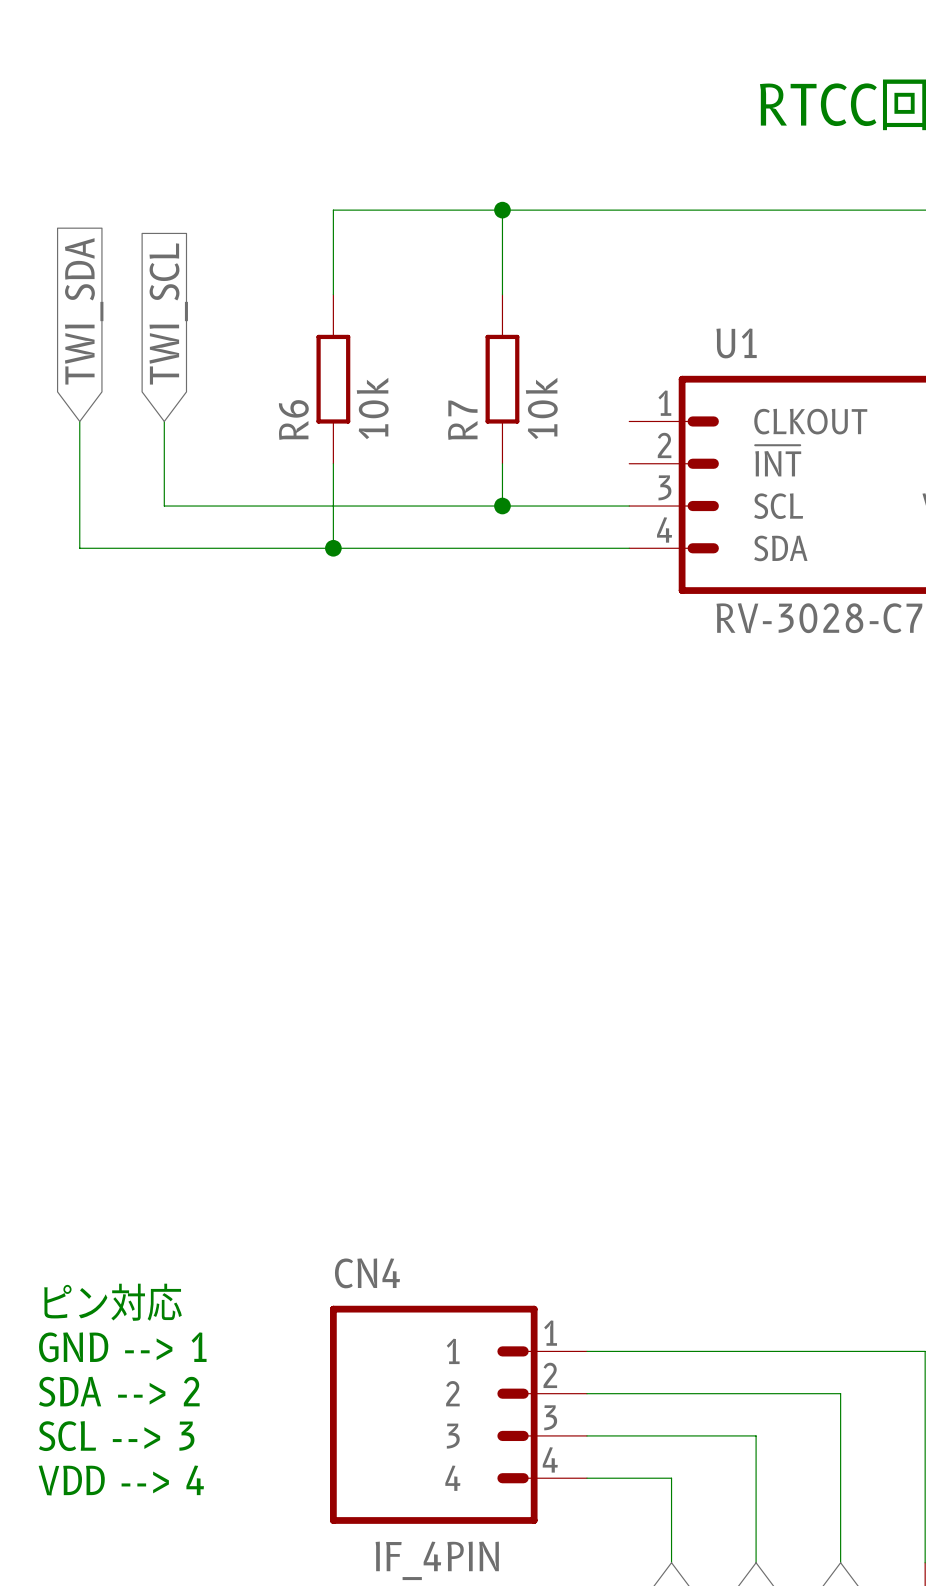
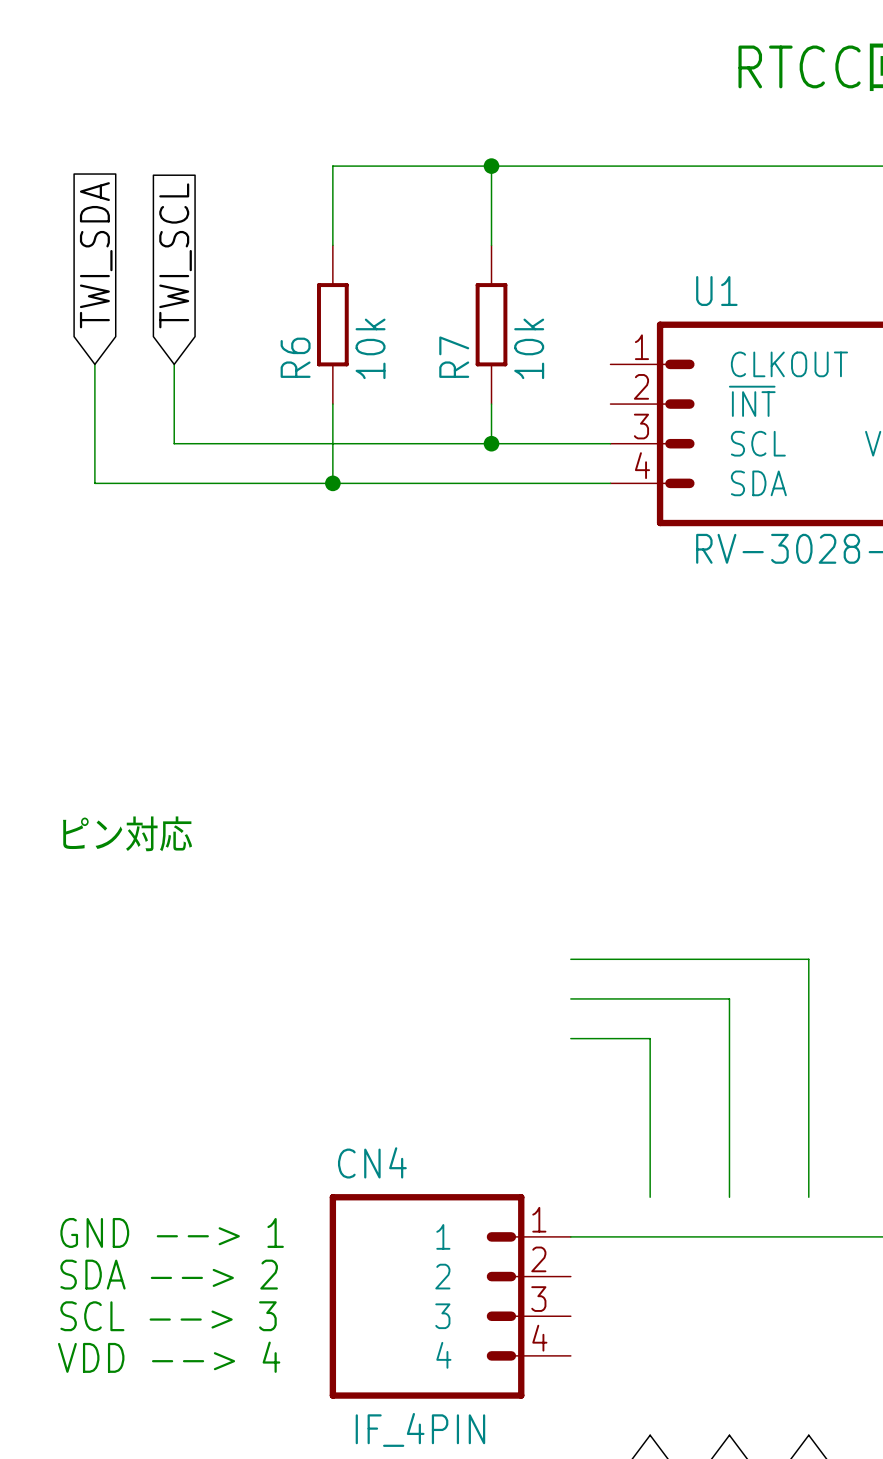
wire: none -> (570, 959) (808, 959) (808, 1197)
wire: none -> (570, 998) (729, 998) (729, 1197)
wire: none -> (570, 1038) (650, 1038) (650, 1197)
text position: ピン対応 (113, 1302) -> ピン対応 (127, 833)
wire: (587, 1393) (840, 1393) (840, 1562) -> none
wire: (587, 1435) (756, 1435) (756, 1562) -> none
wire: (587, 1478) (671, 1478) (671, 1562) -> none

